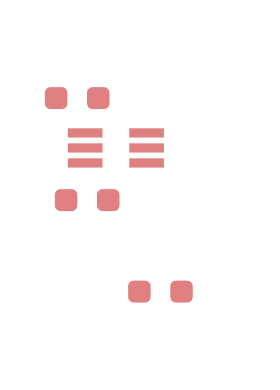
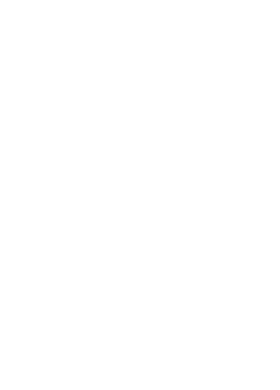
part: (77, 98) -> none
part: (115, 147) -> none
part: (87, 200) -> none
part: (160, 291) -> none

